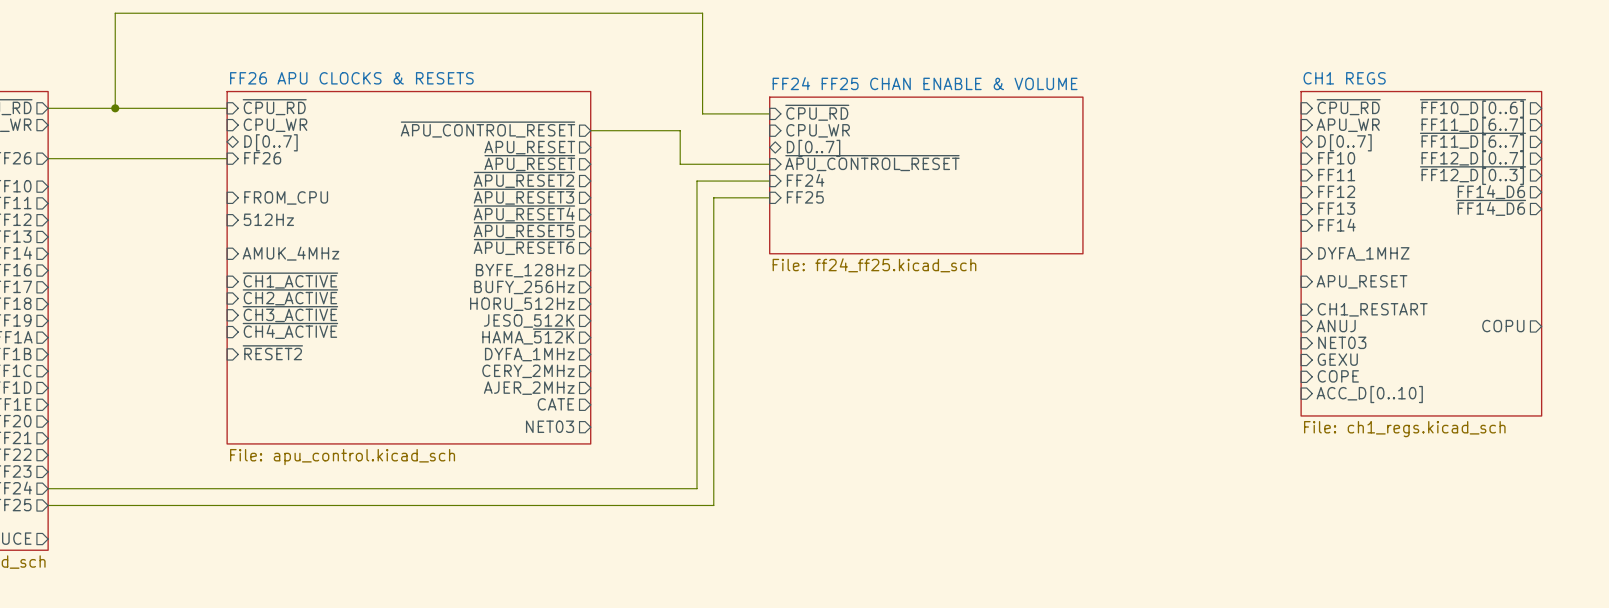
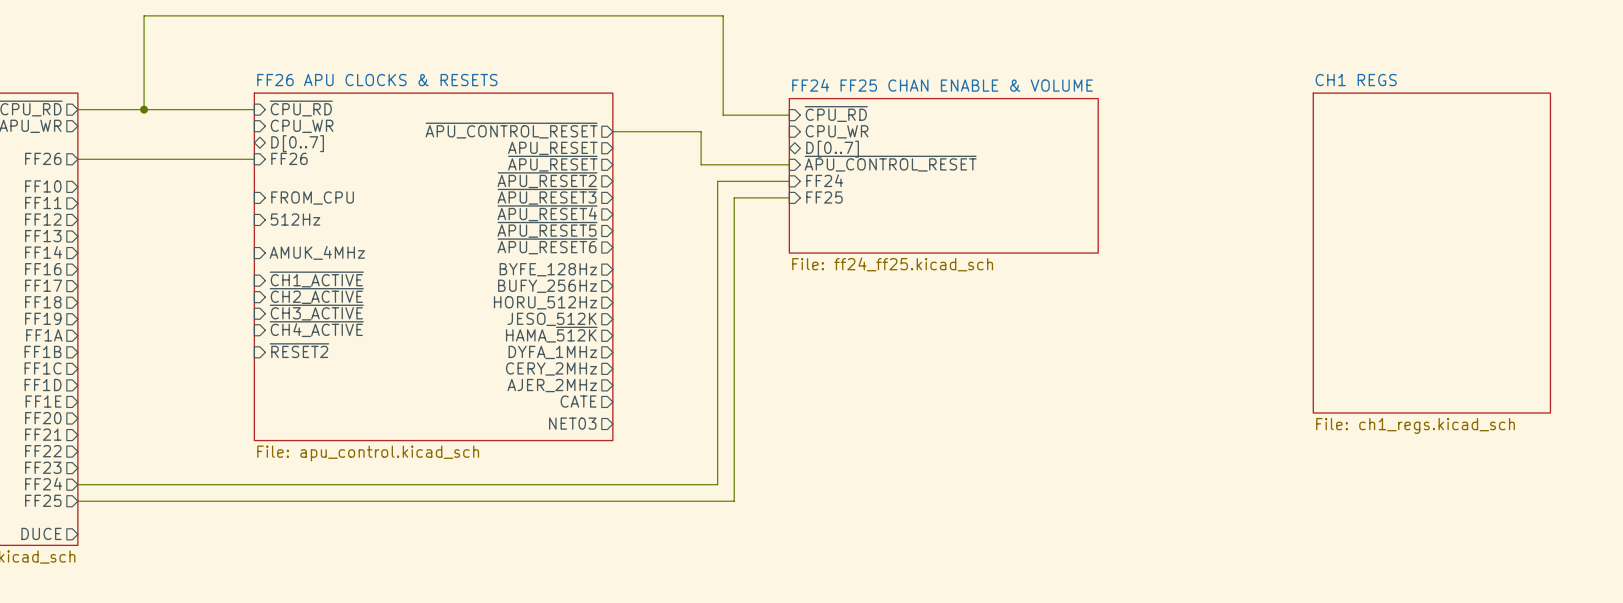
sheet pin: ~{CPU_RD} (1348, 107) -> none
sheet pin: ~{FF10_D[0..6]} (1473, 108) -> none
sheet pin: APU_WR (1348, 125) -> none
sheet pin: FF11_D[6..7] (1472, 126) -> none
sheet pin: D[0..7] (1344, 142) -> none
sheet pin: ~{FF11_D[6..7]} (1473, 142) -> none
sheet pin: FF10 (1336, 158) -> none
sheet pin: FF12_D[0..7] (1472, 159) -> none
sheet pin: FF11 (1336, 175) -> none
sheet pin: ~{FF12_D[0..3]} (1473, 175) -> none
sheet pin: FF12 (1336, 191) -> none
sheet pin: FF14_D6 (1491, 192) -> none
sheet pin: ~{FF14_D6} (1491, 207) -> none
sheet pin: FF13 (1336, 208) -> none
sheet pin: FF14 (1336, 225) -> none
sheet pin: DYFA_1MHZ (1363, 253) -> none
sheet pin: APU_RESET (1362, 281) -> none
sheet pin: CH1_RESTART (1372, 309) -> none
sheet pin: ANUJ (1336, 326) -> none
sheet pin: COPU (1503, 326) -> none
sheet pin: NET03 (1342, 342) -> none
sheet pin: GEXU (1337, 359) -> none
sheet pin: COPE (1338, 376) -> none
sheet pin: ACC_D[0..10] (1369, 394) -> none

